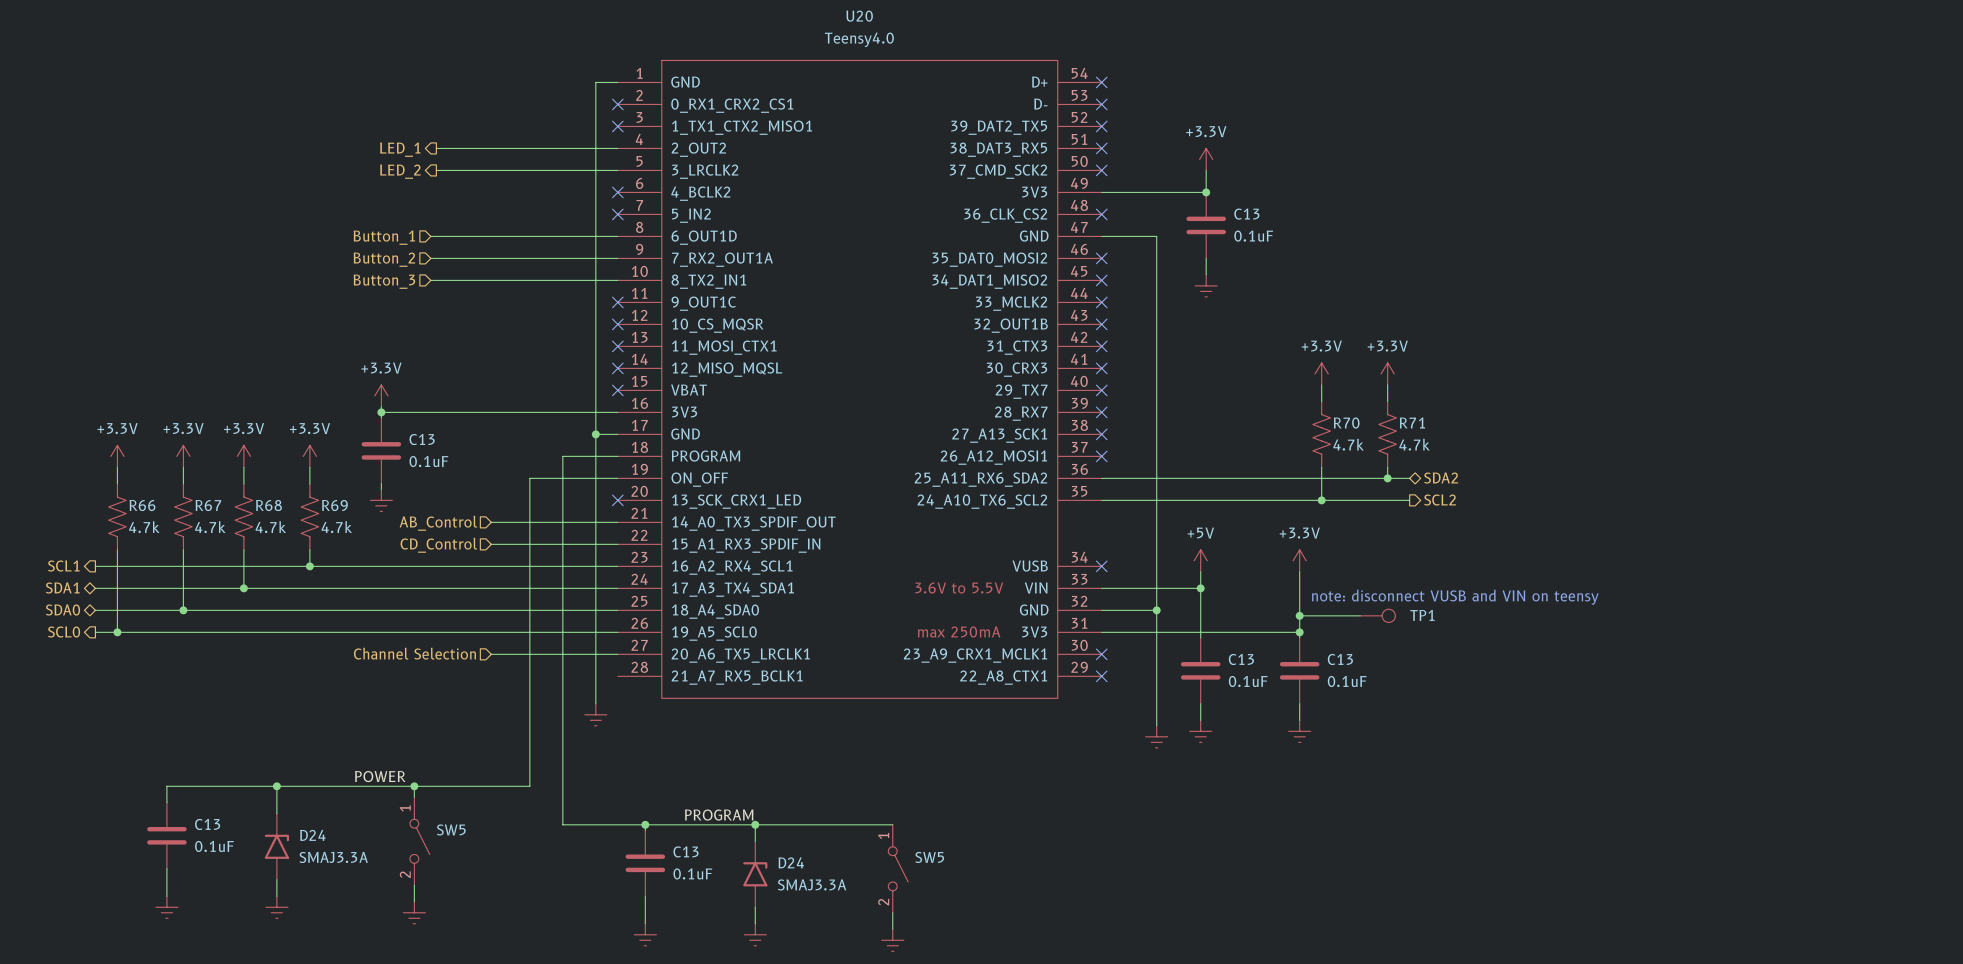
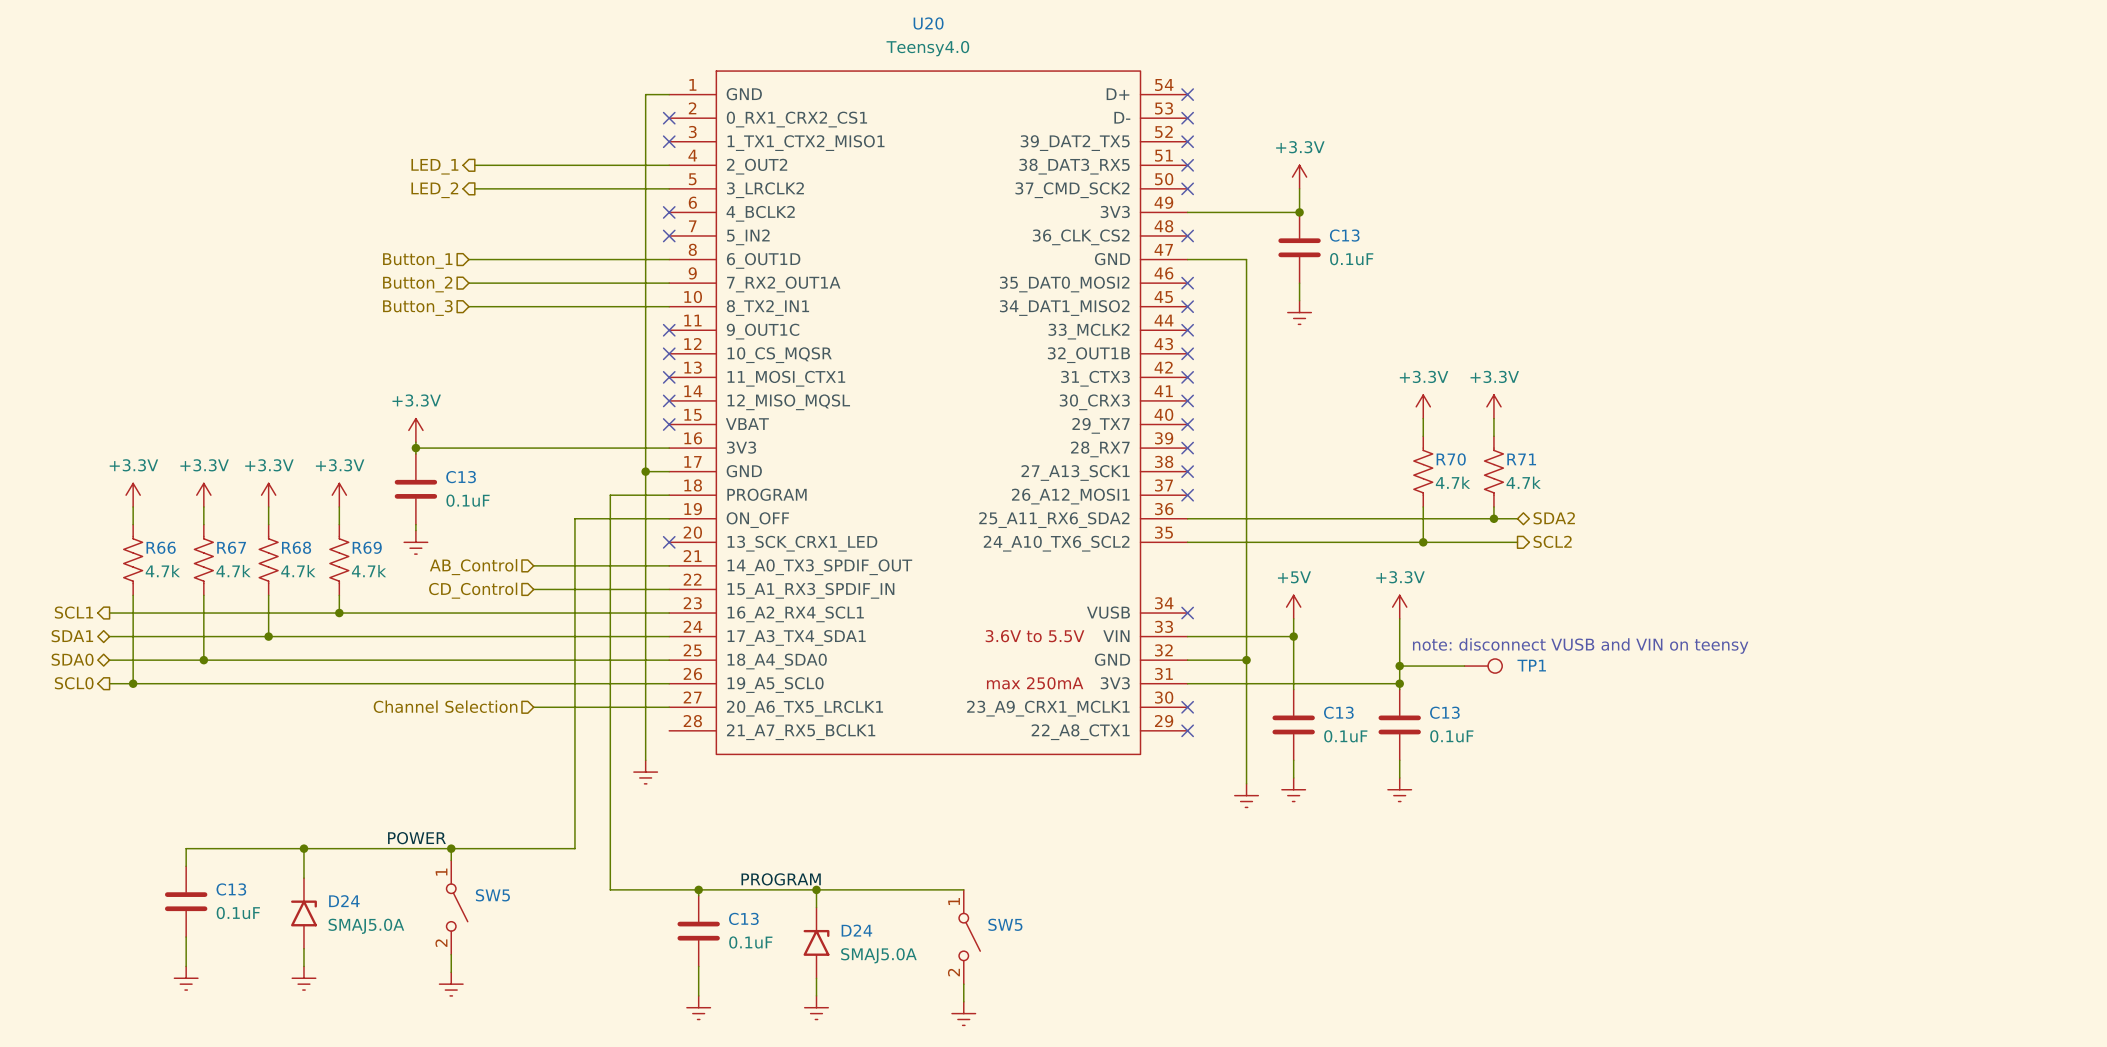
D24 value: SMAJ3.3A (333, 857) -> SMAJ5.0A (366, 926)
D24 value: SMAJ3.3A (812, 884) -> SMAJ5.0A (878, 955)

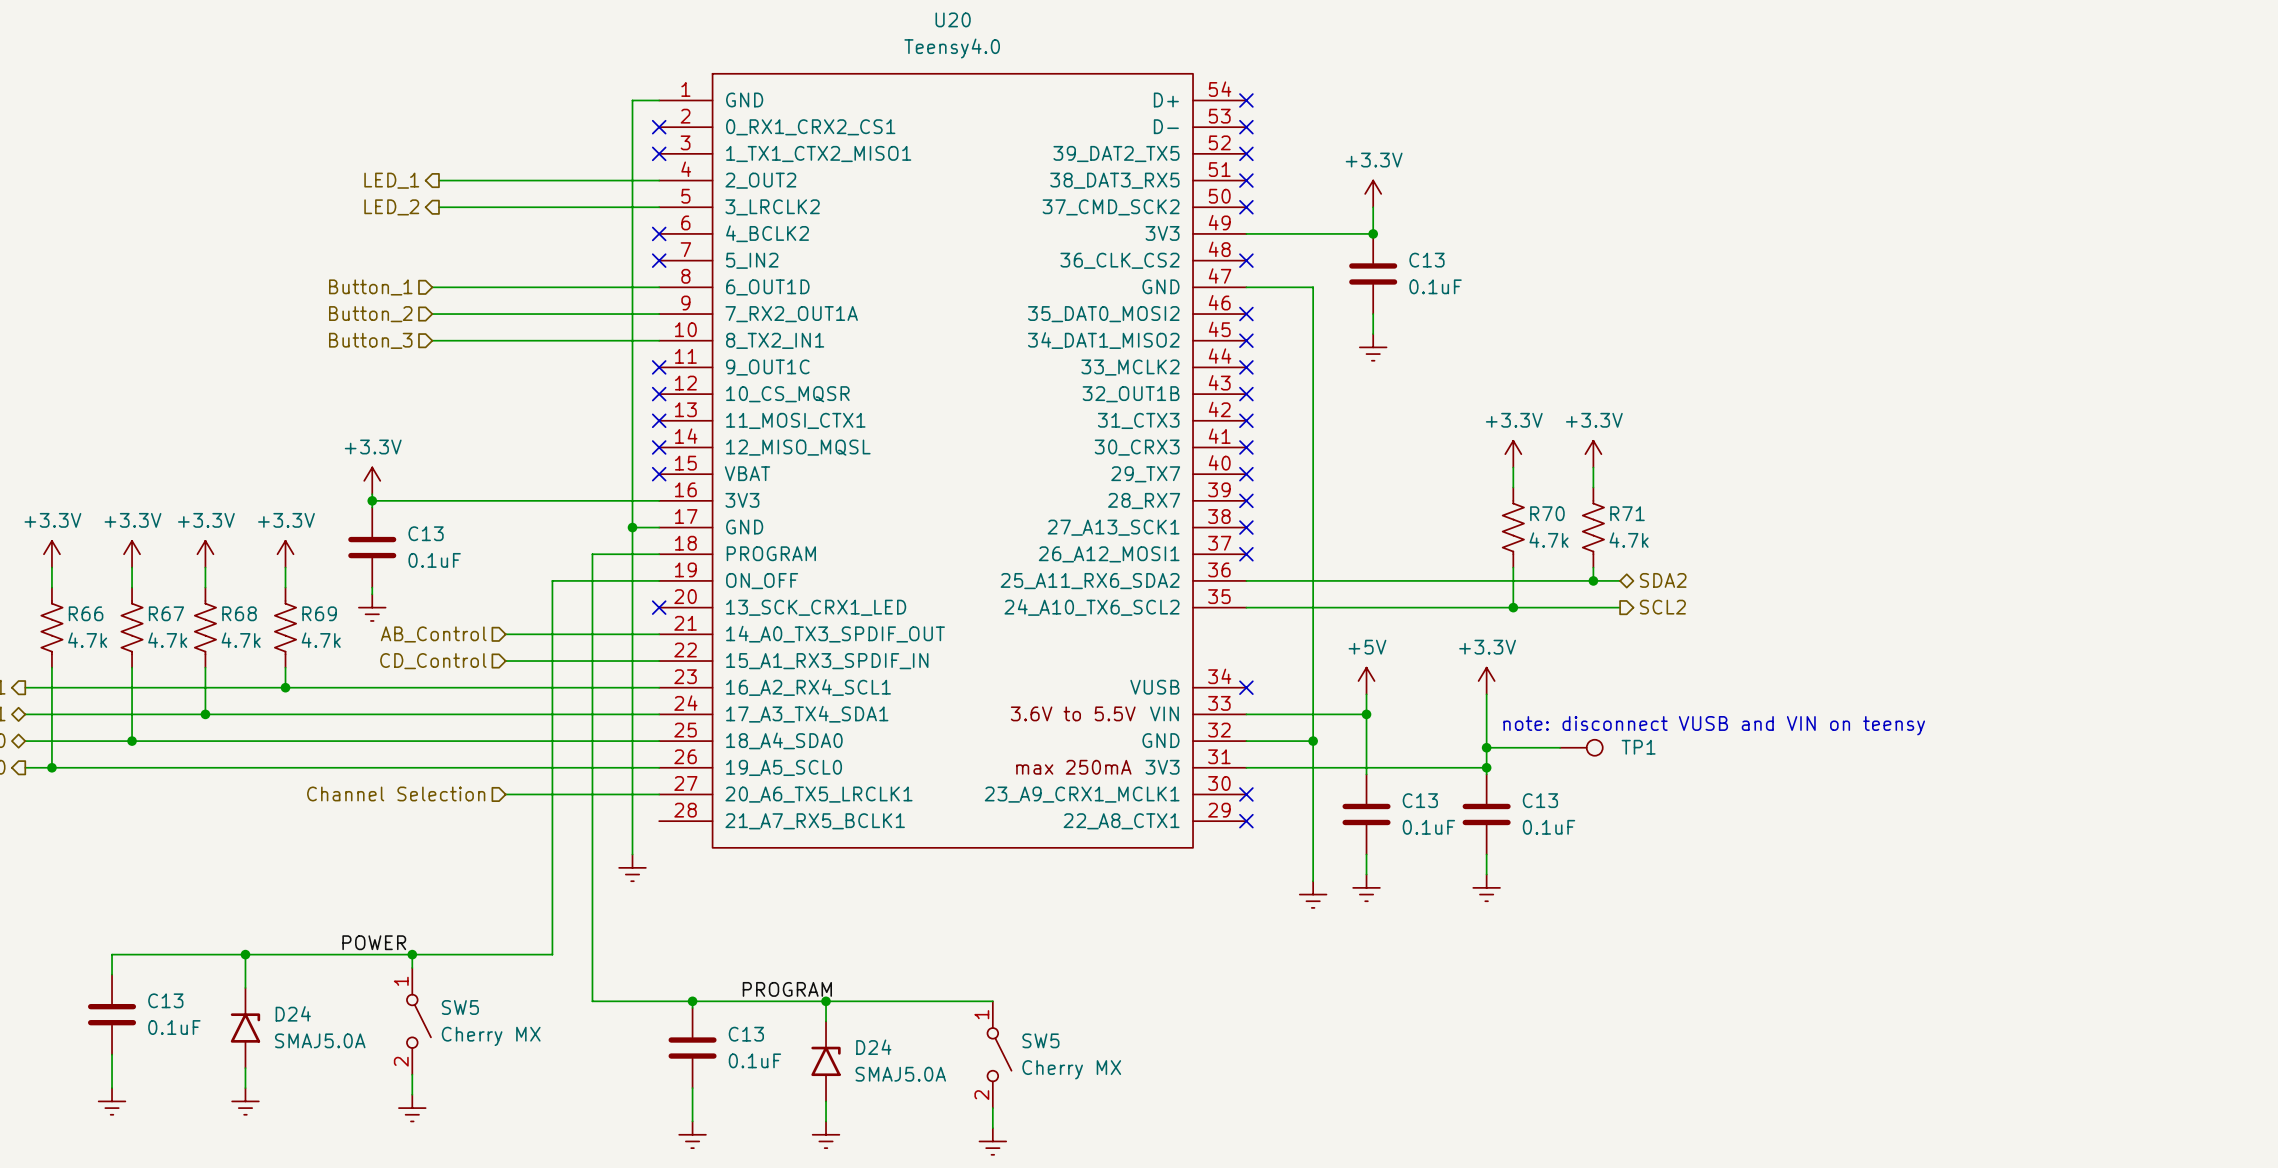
SW5 value: none -> Cherry MX (491, 1036)
SW5 value: none -> Cherry MX (1071, 1069)

